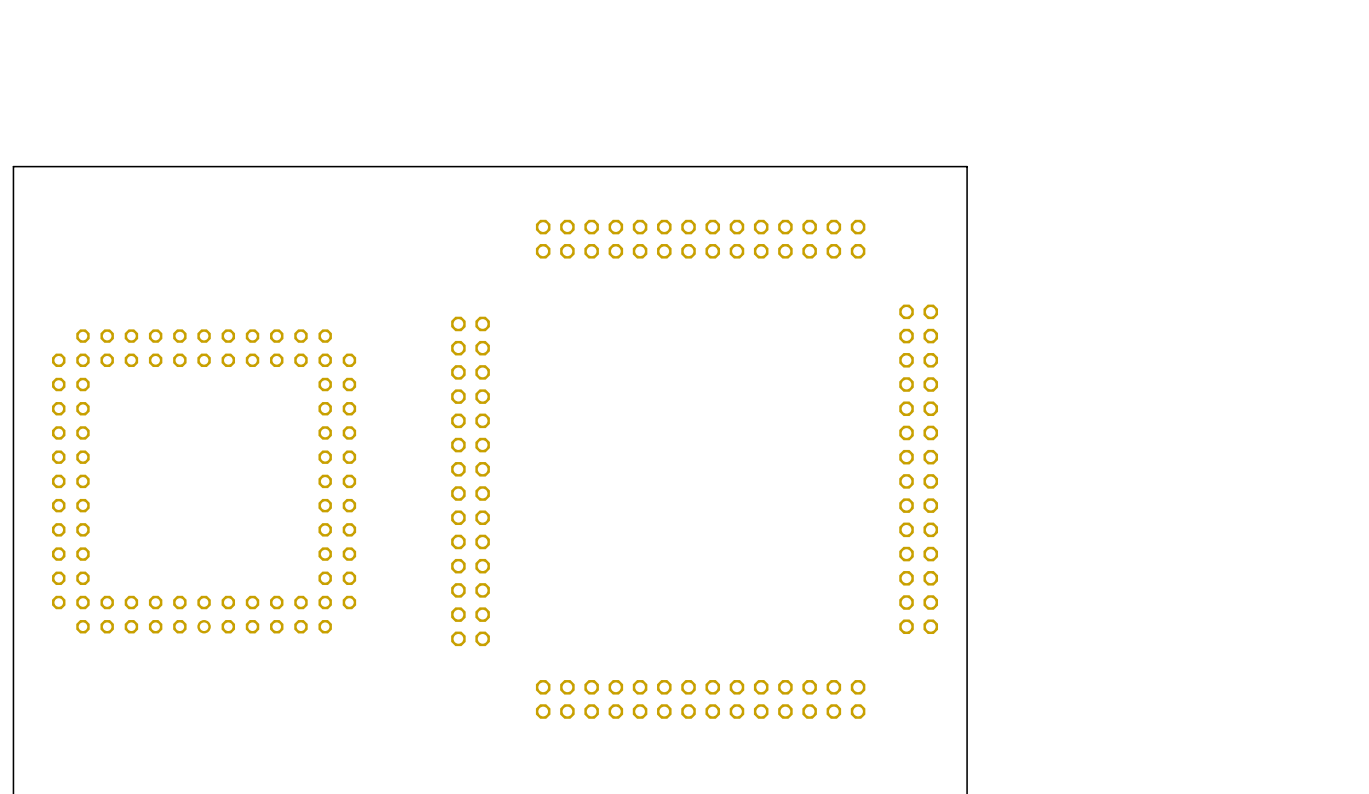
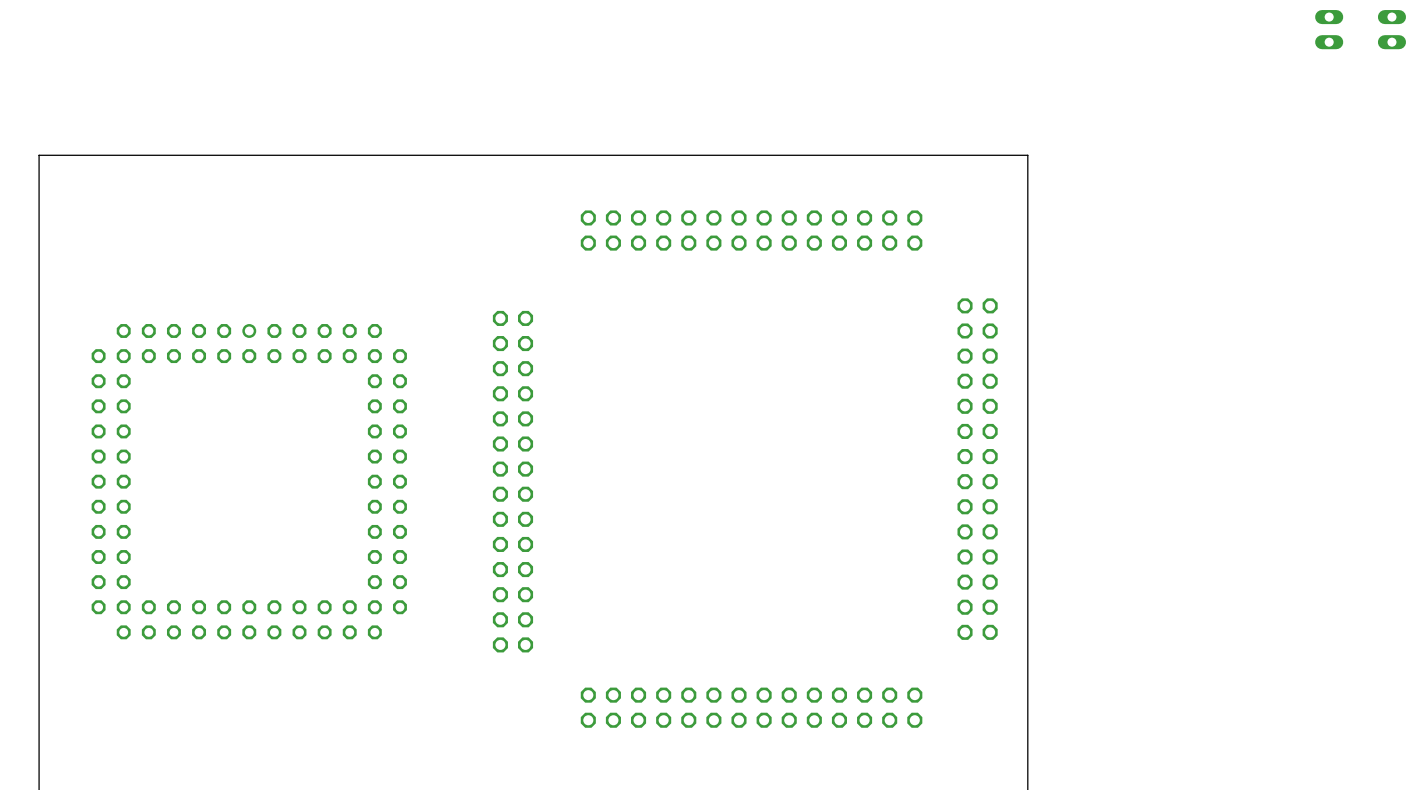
part: none -> (1329, 29)
part: none -> (1391, 29)
part rotation: 0° (204, 481) -> 180° (249, 481)

